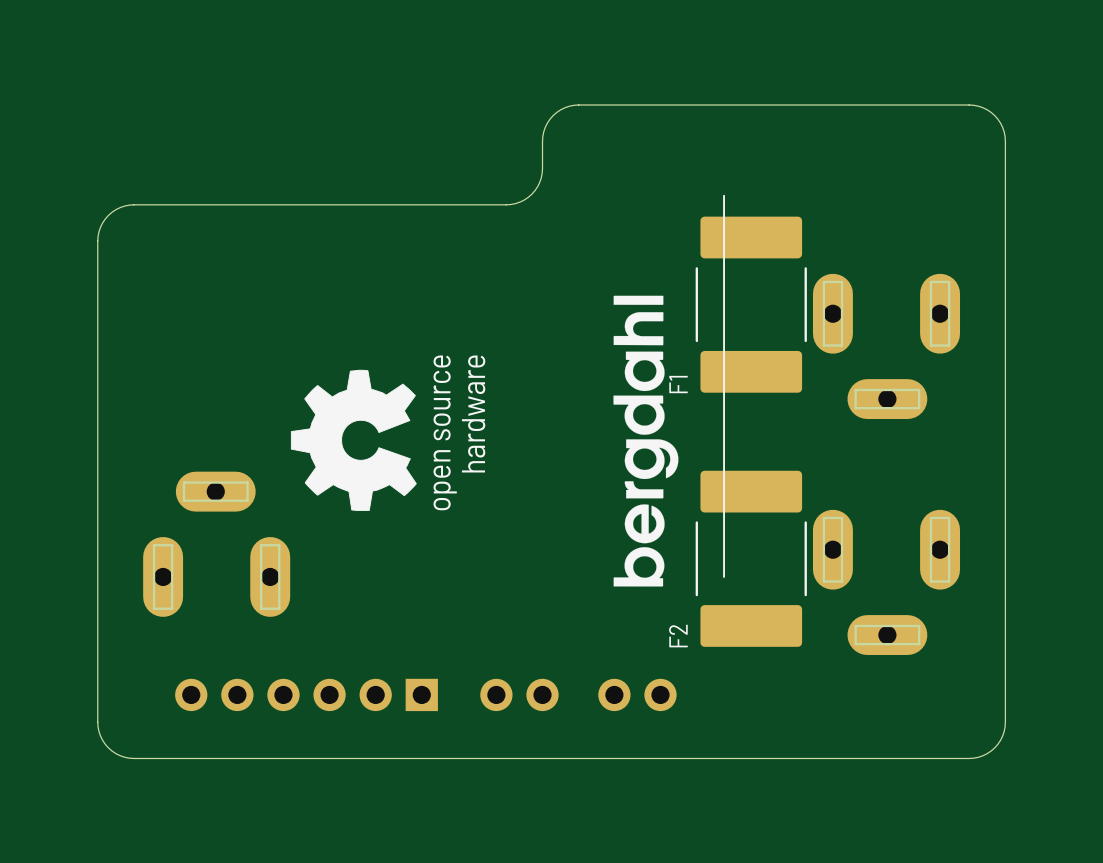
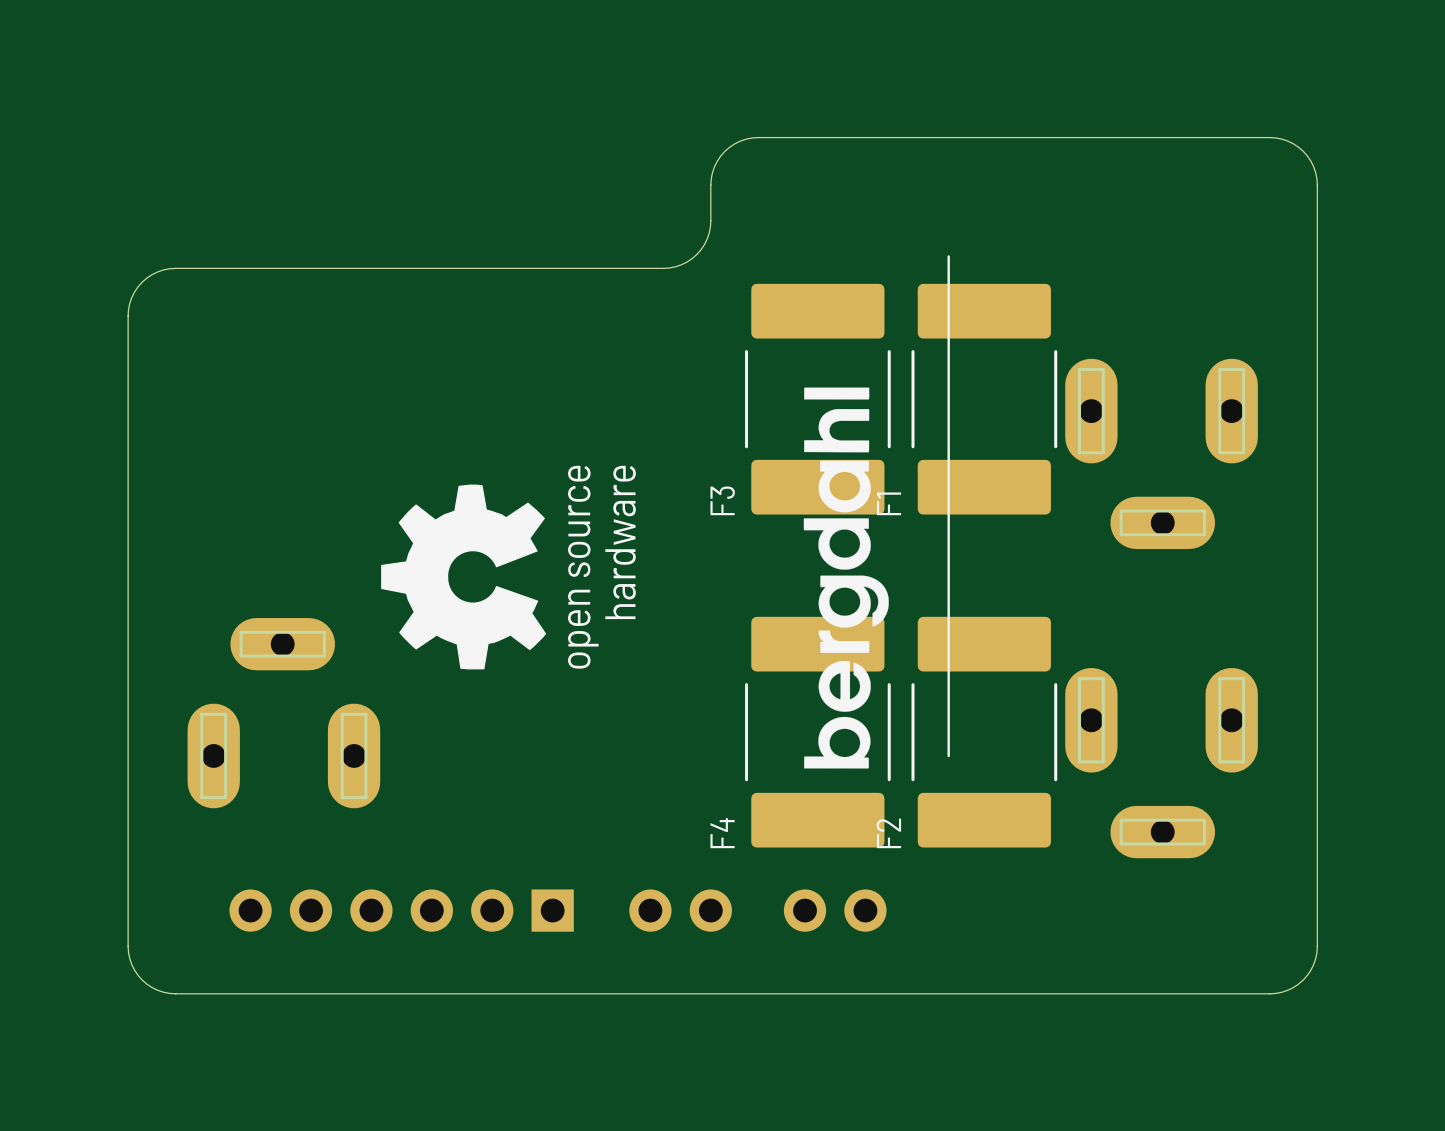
F3: none -> (817, 399)
F4: none -> (817, 732)

